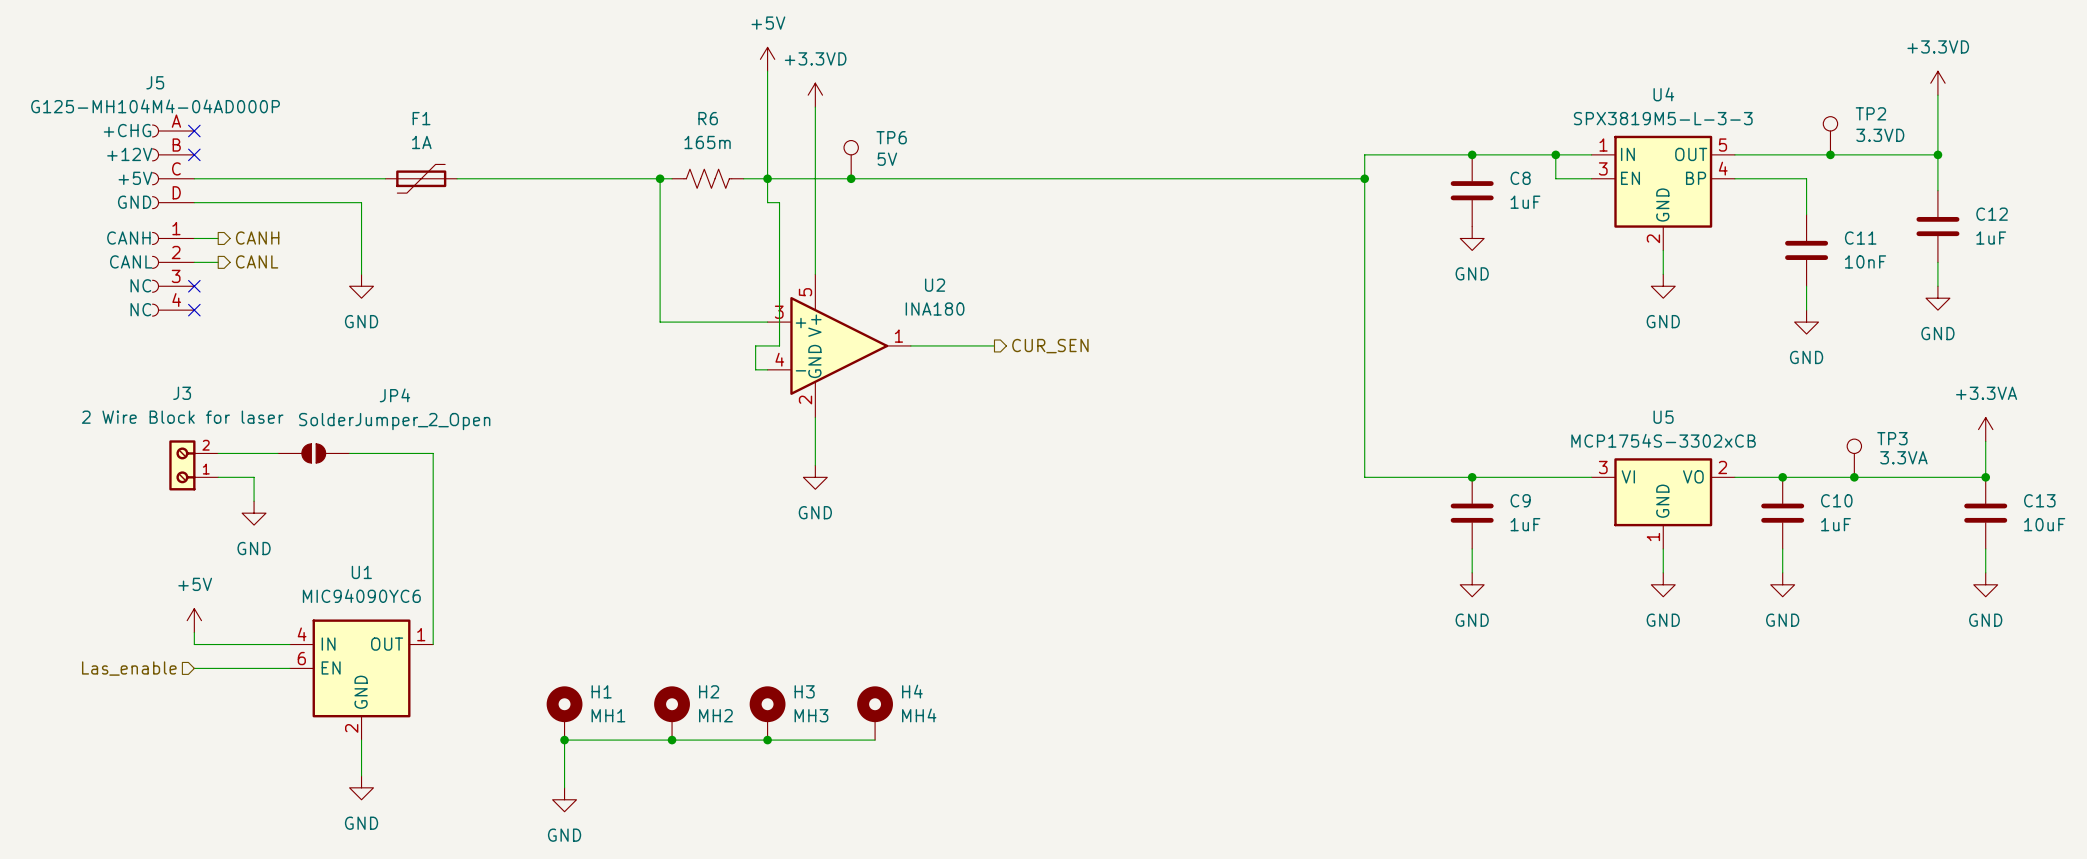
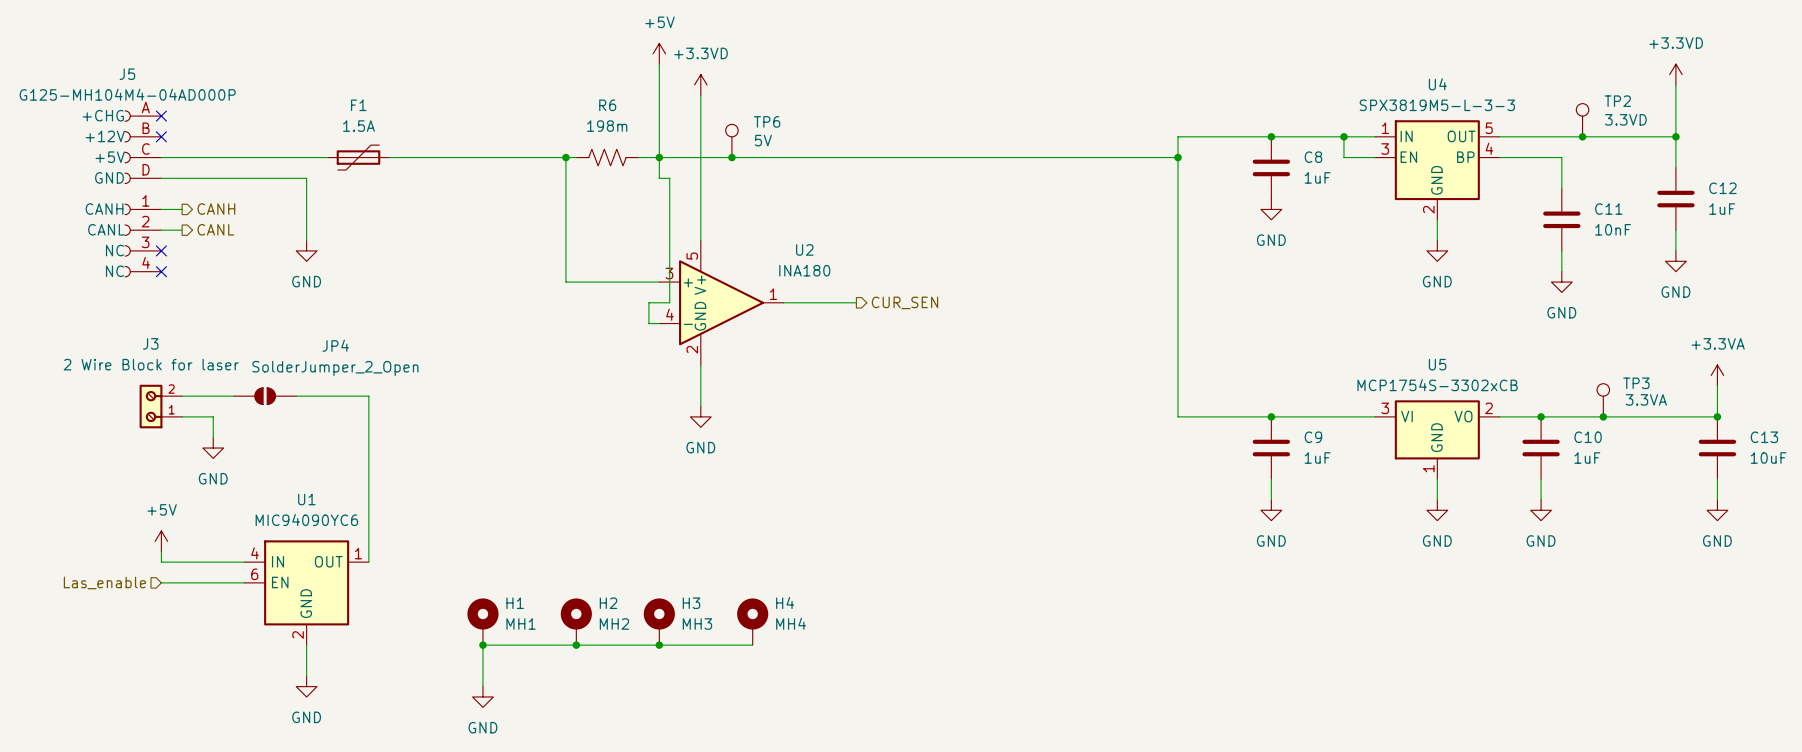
F1 value: 1A (421, 142) -> 1.5A (358, 126)
R6 value: 165m (707, 142) -> 198m (607, 126)

